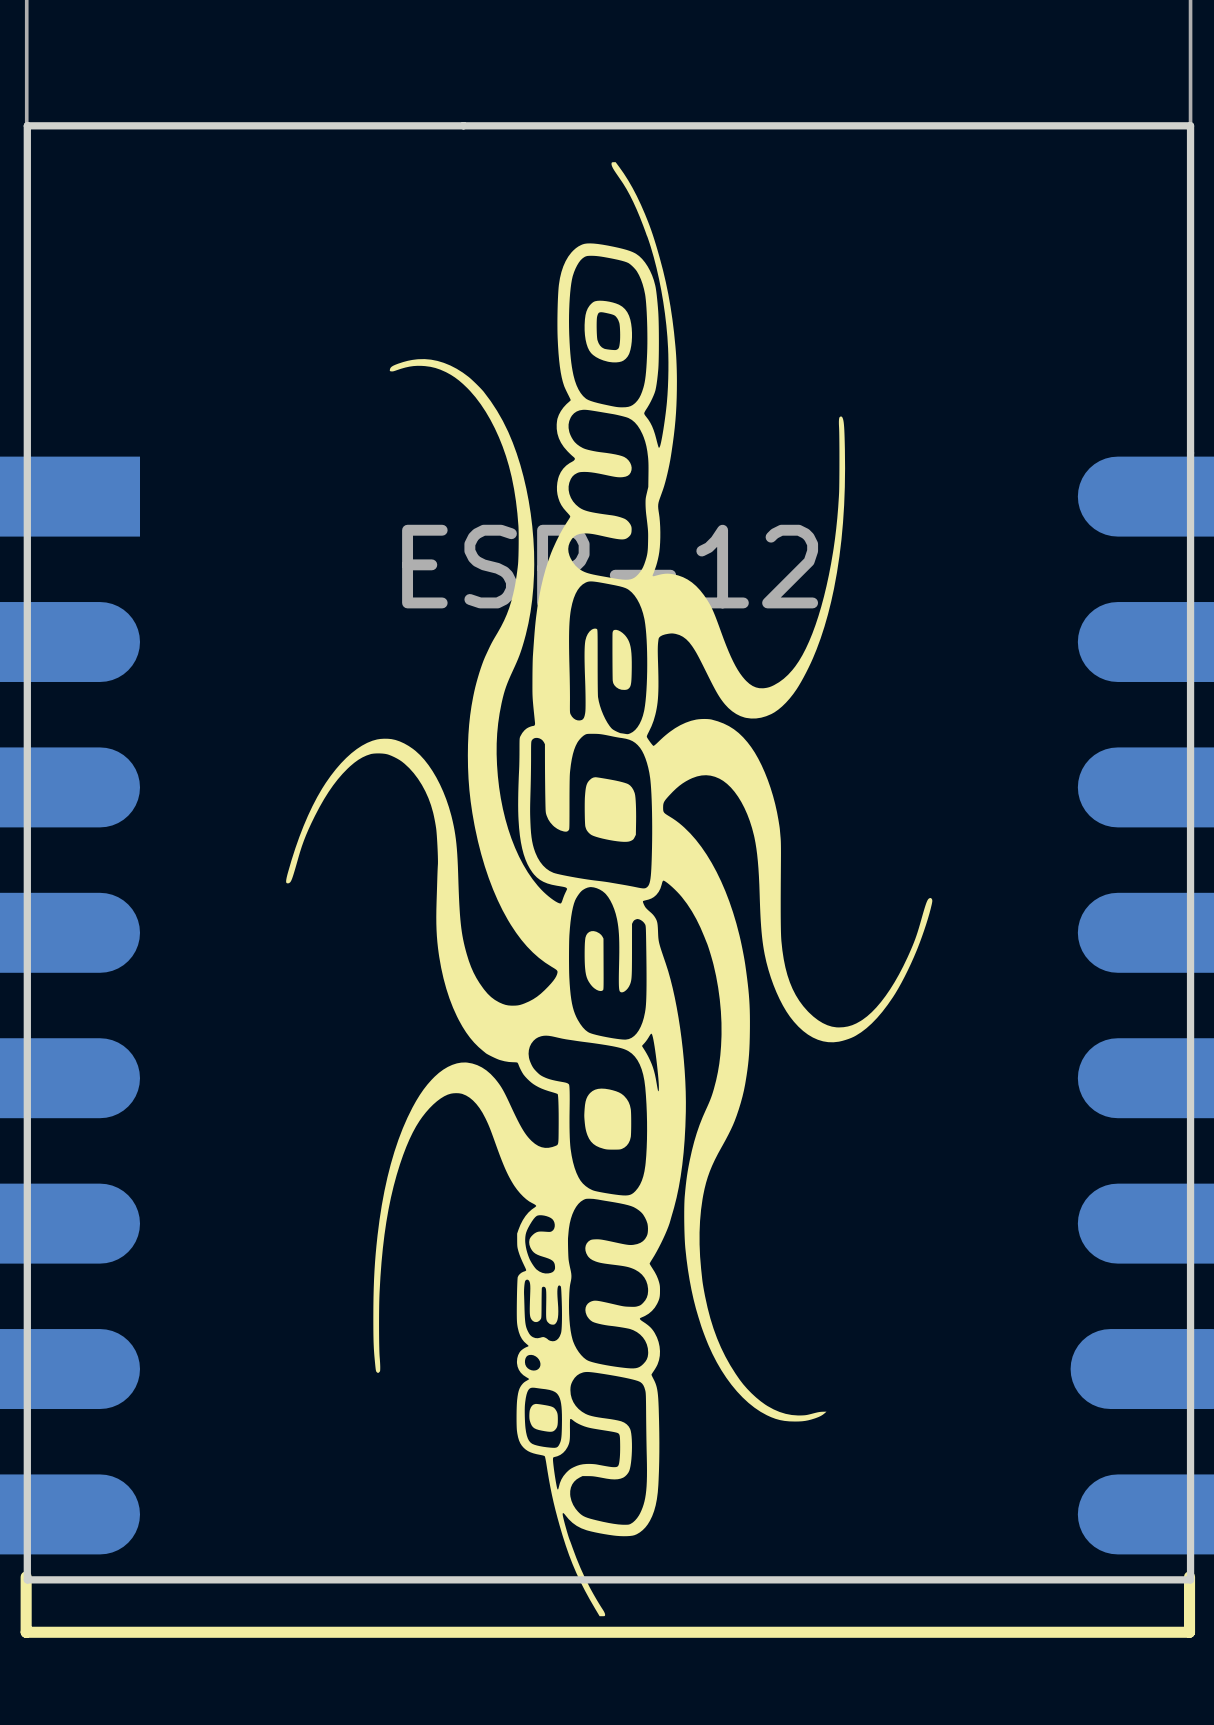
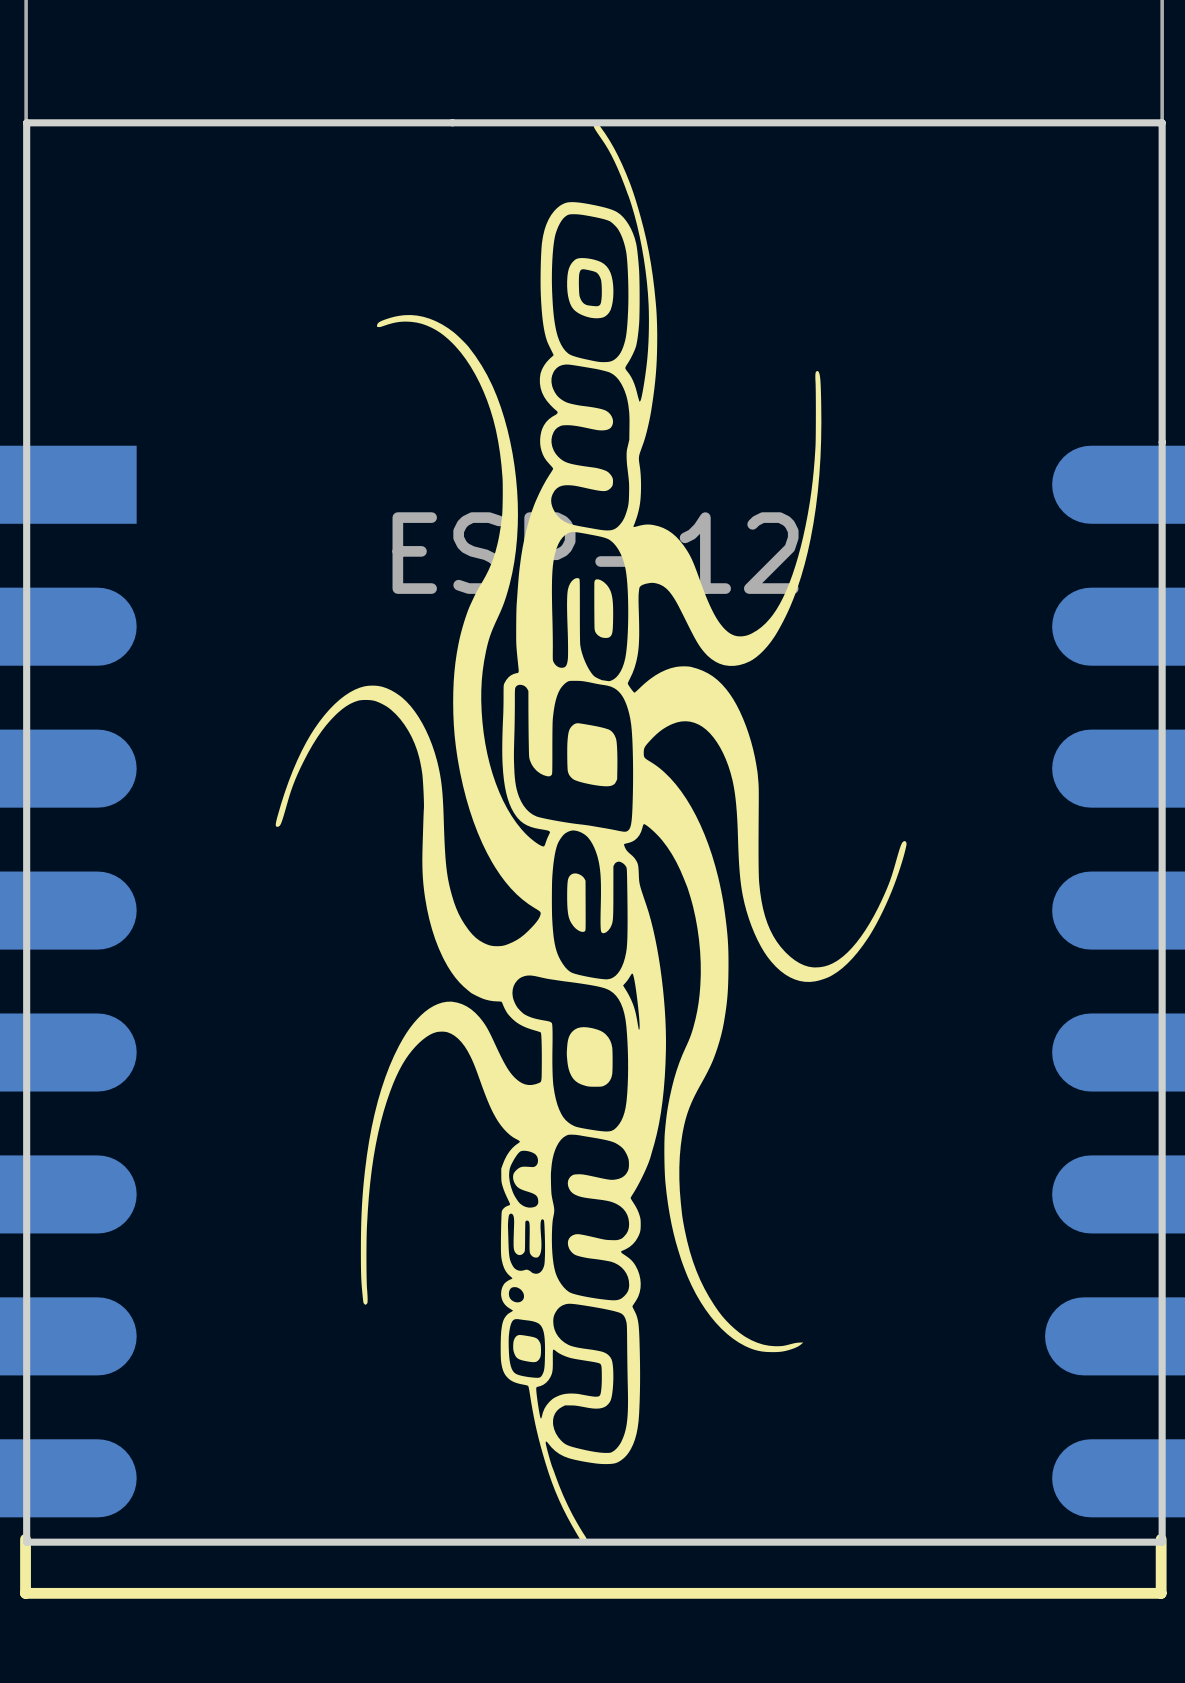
drawing position: (609, 889) -> (591, 832)

